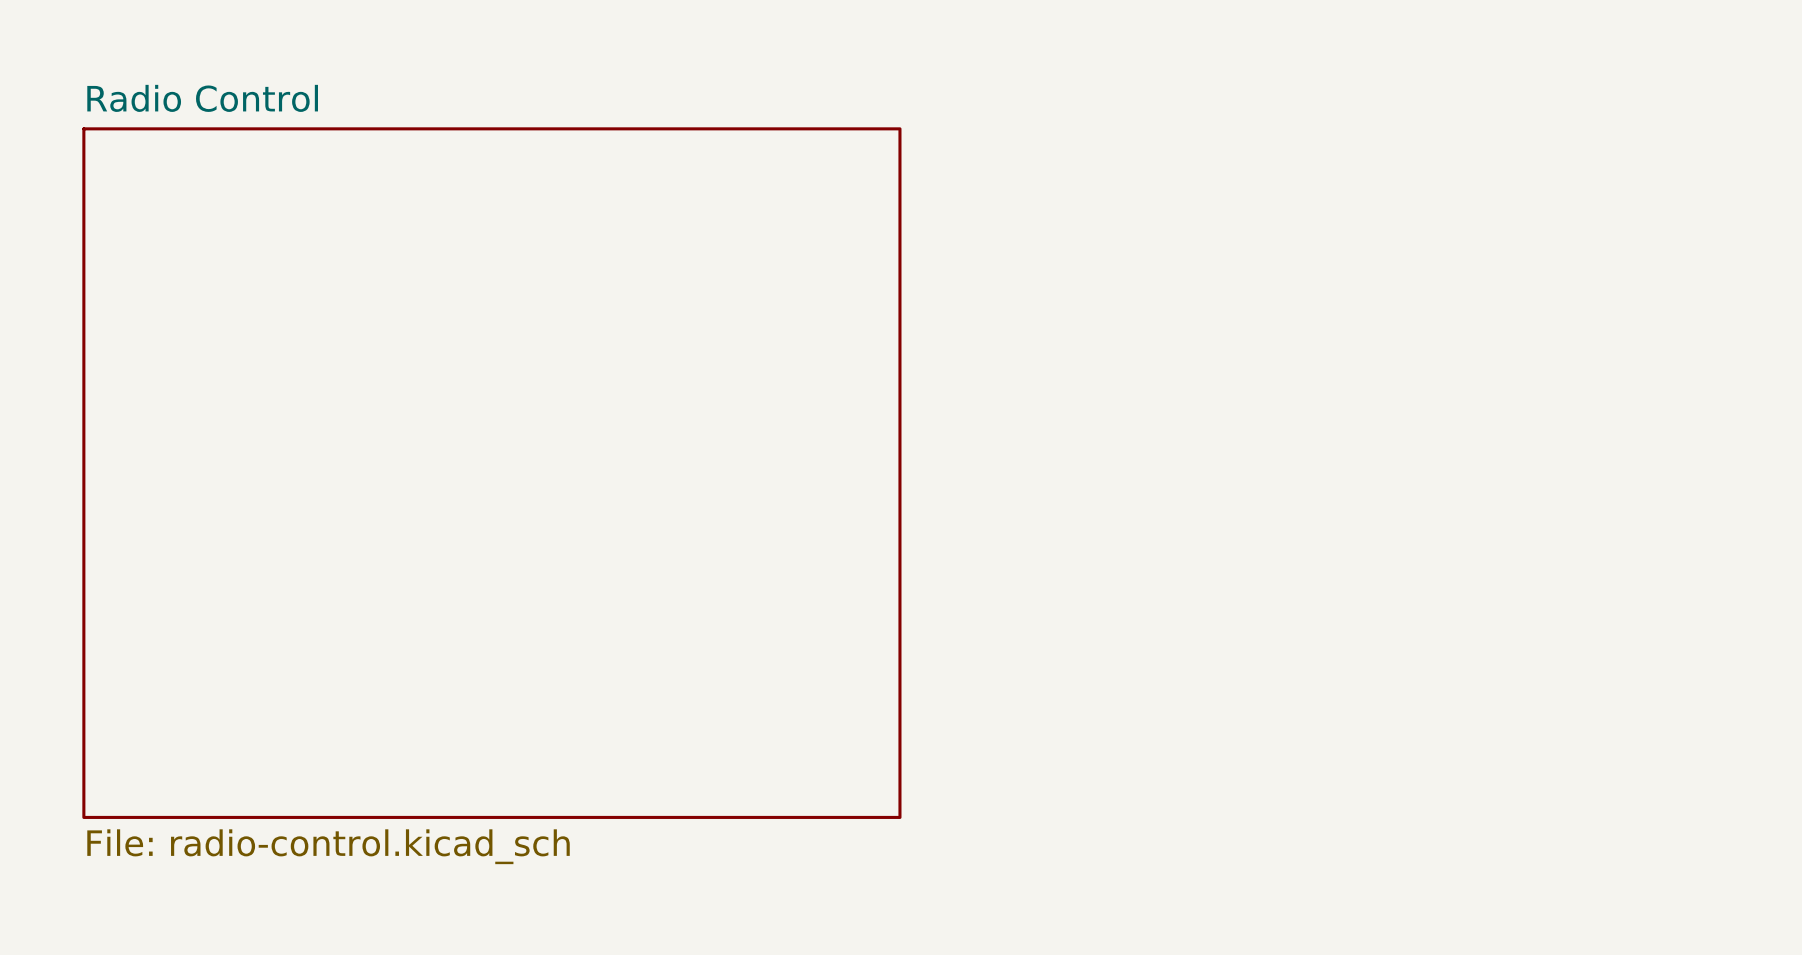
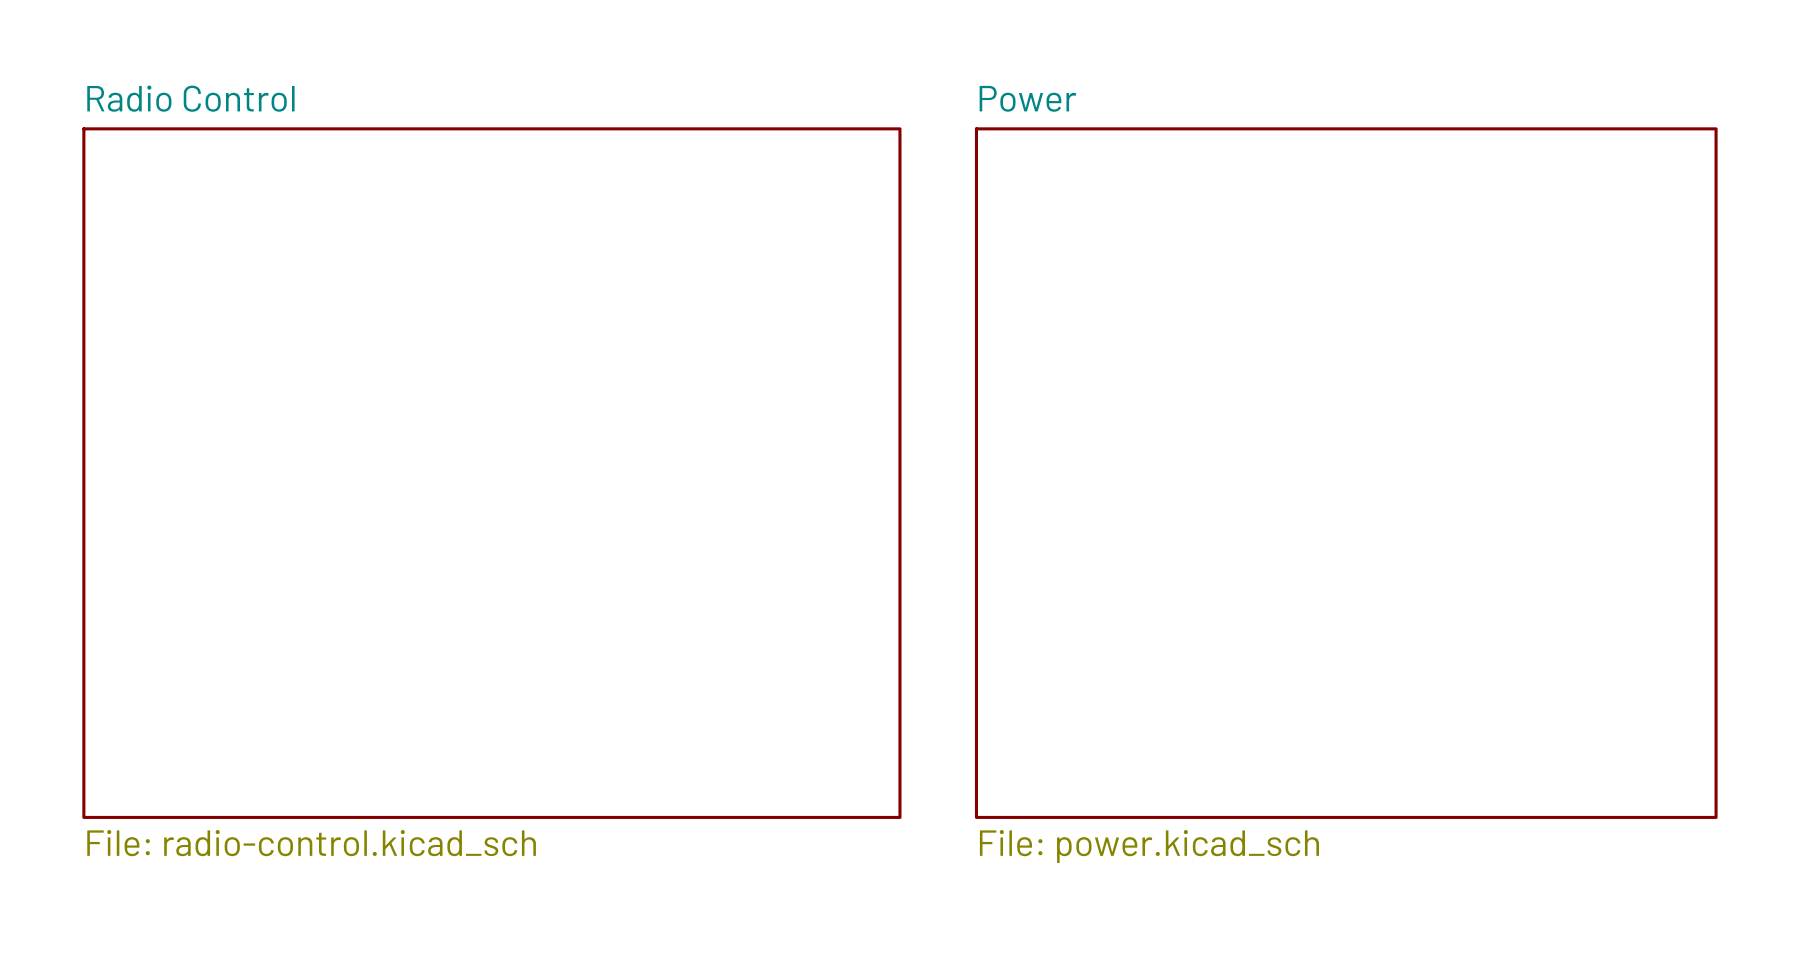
sheet Power: none -> File: power.kicad_sch (1346, 473)

